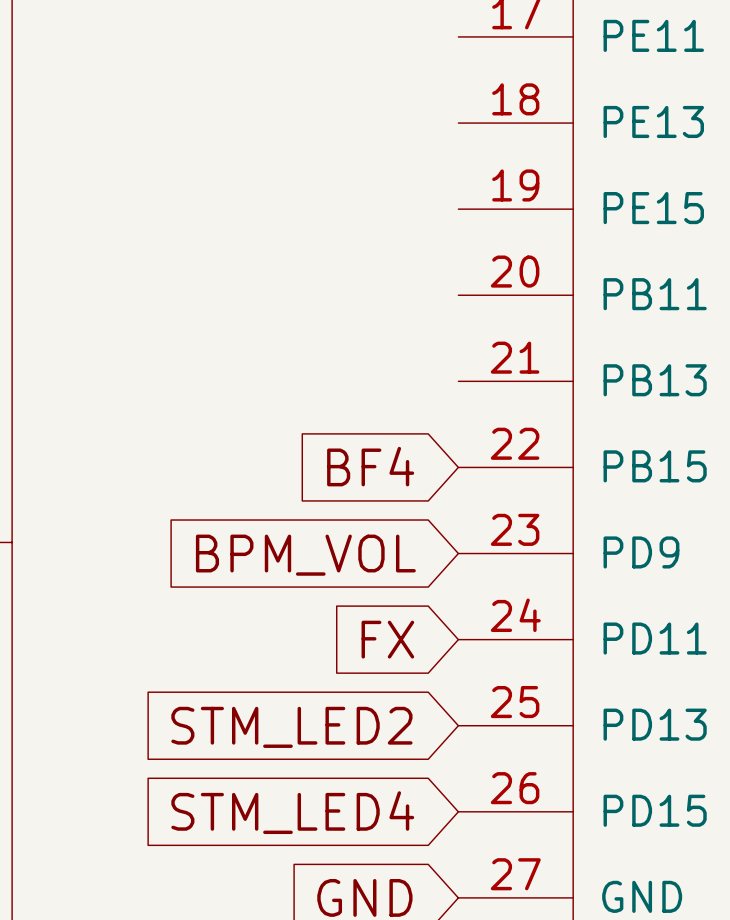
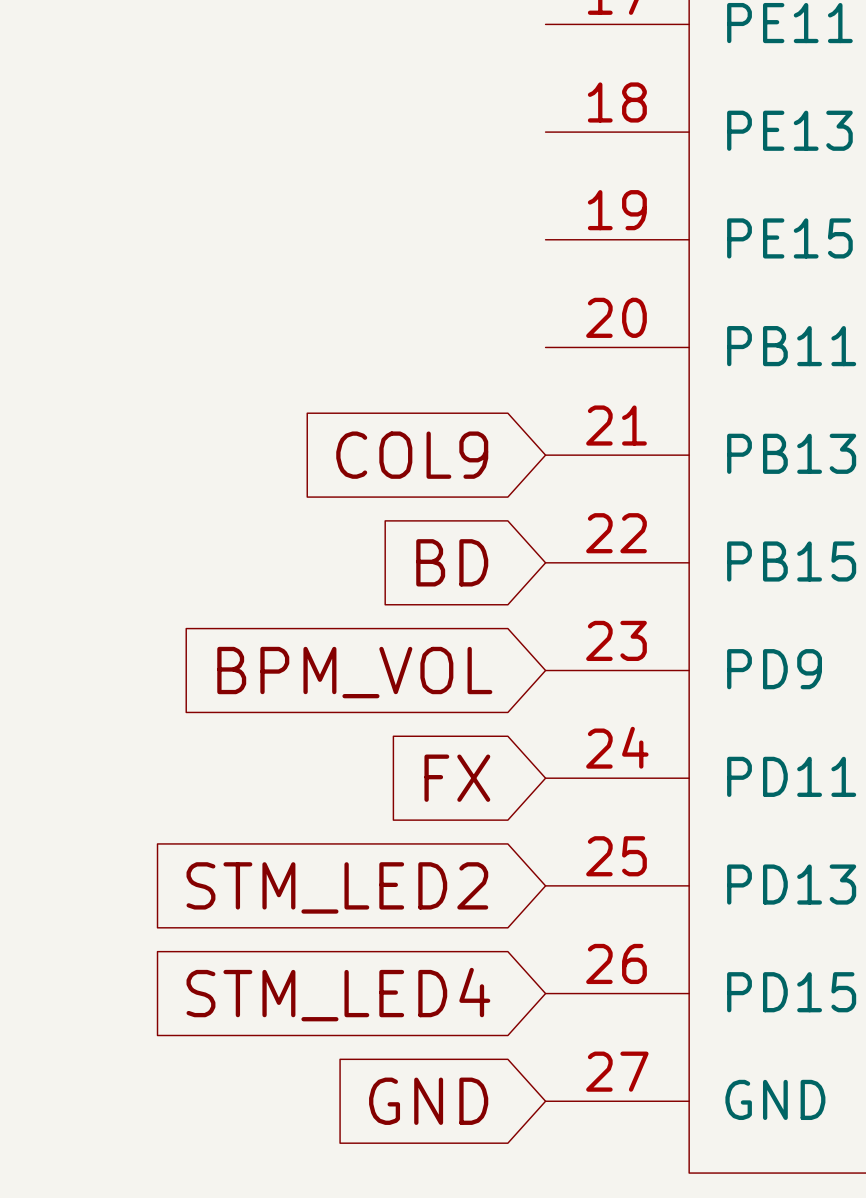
global label: none -> COL9 (412, 455)
global label: BF4 (370, 466) -> BD (452, 562)

